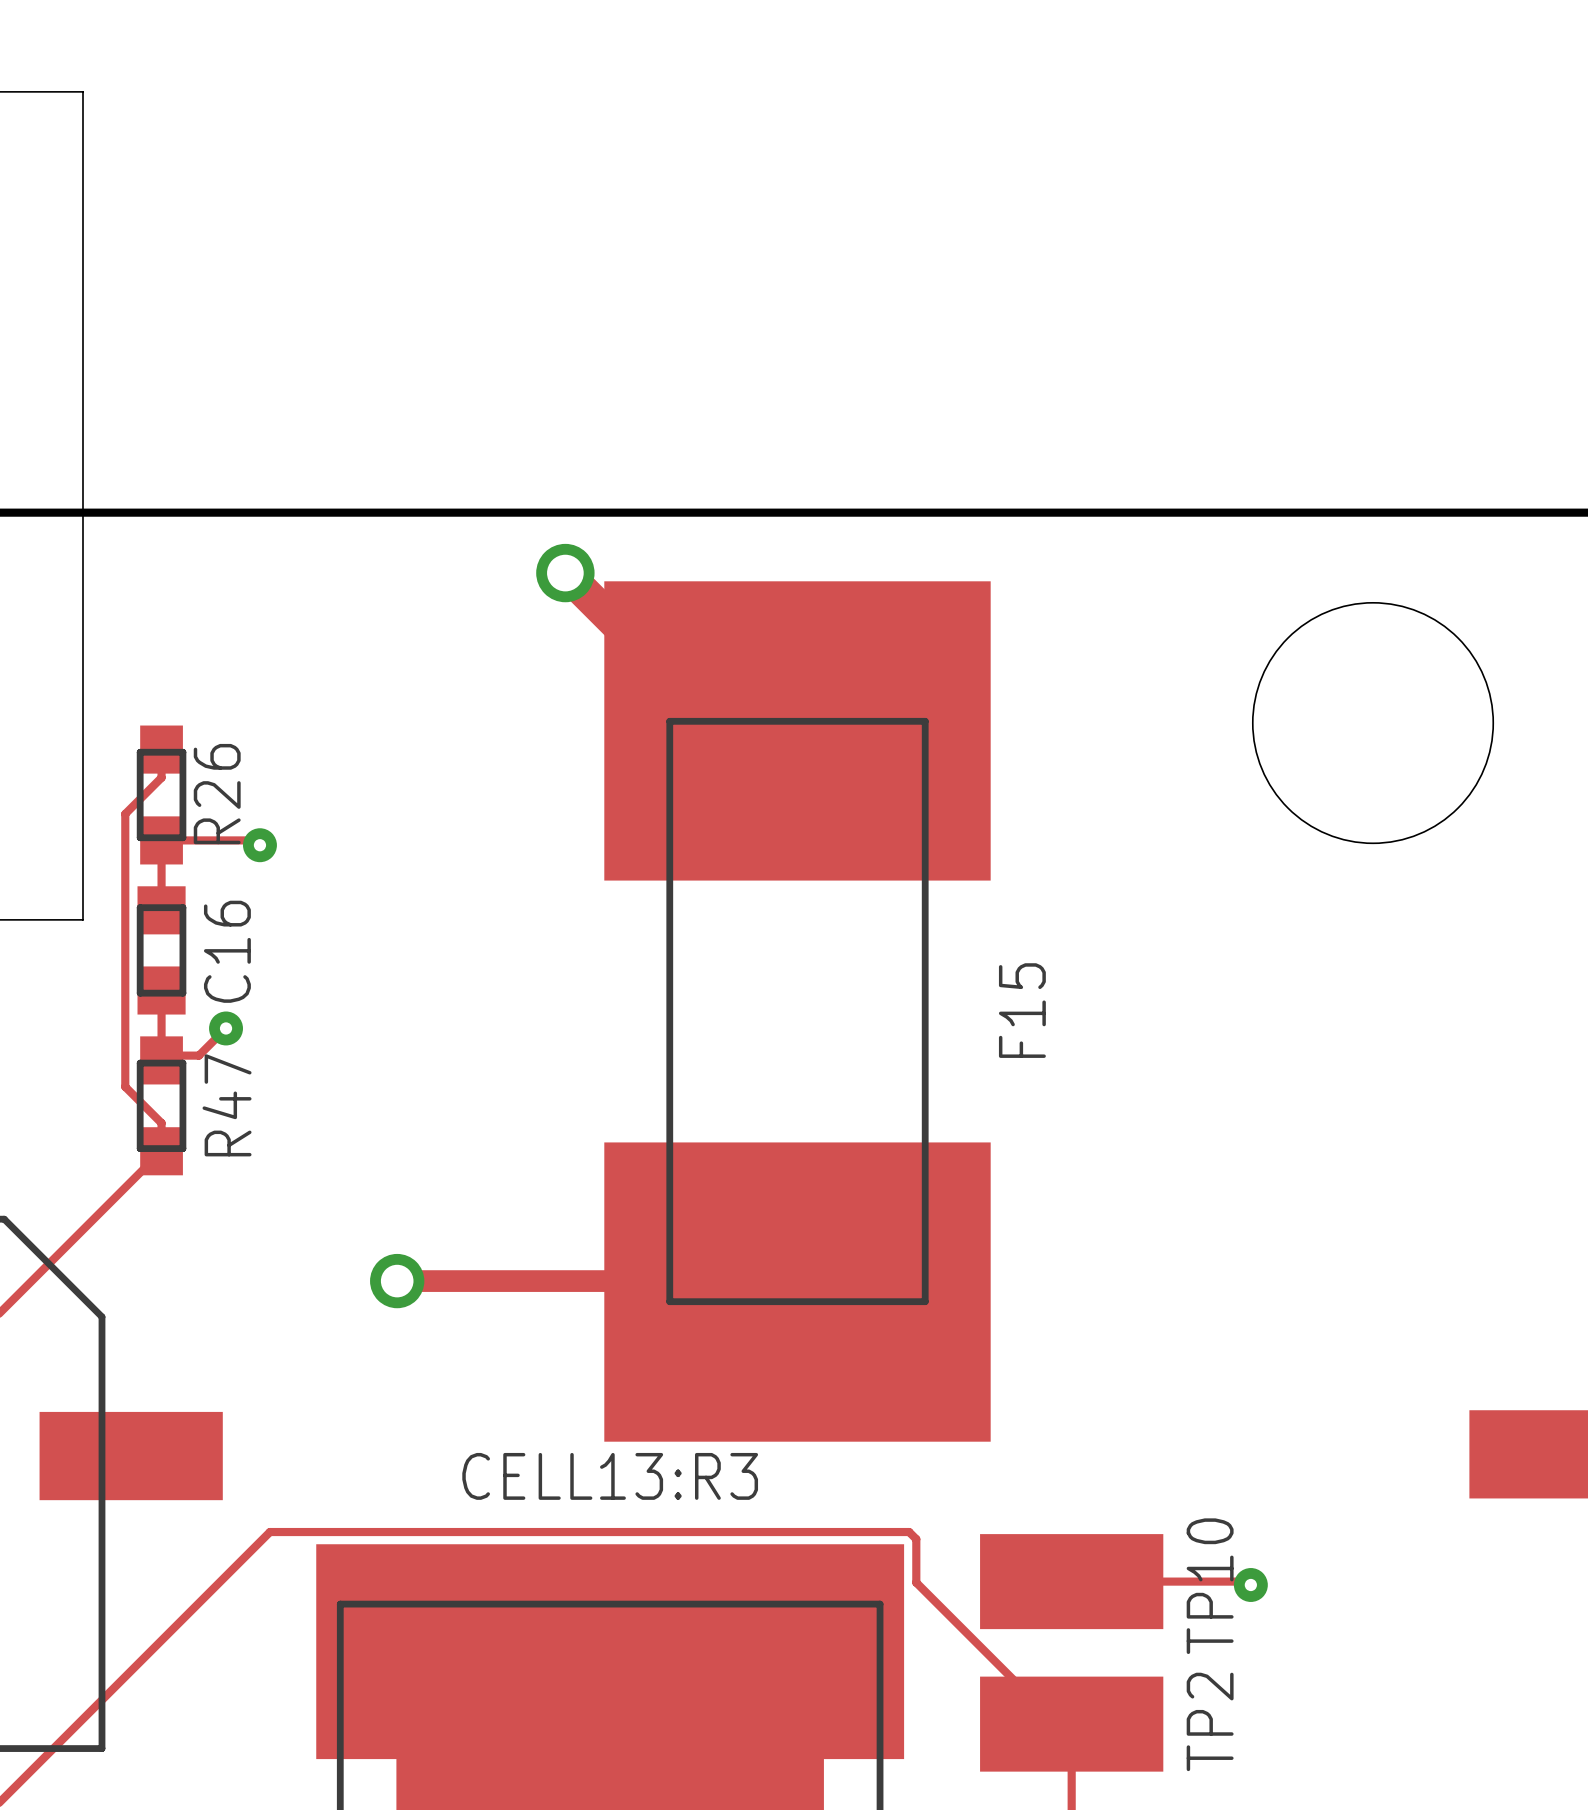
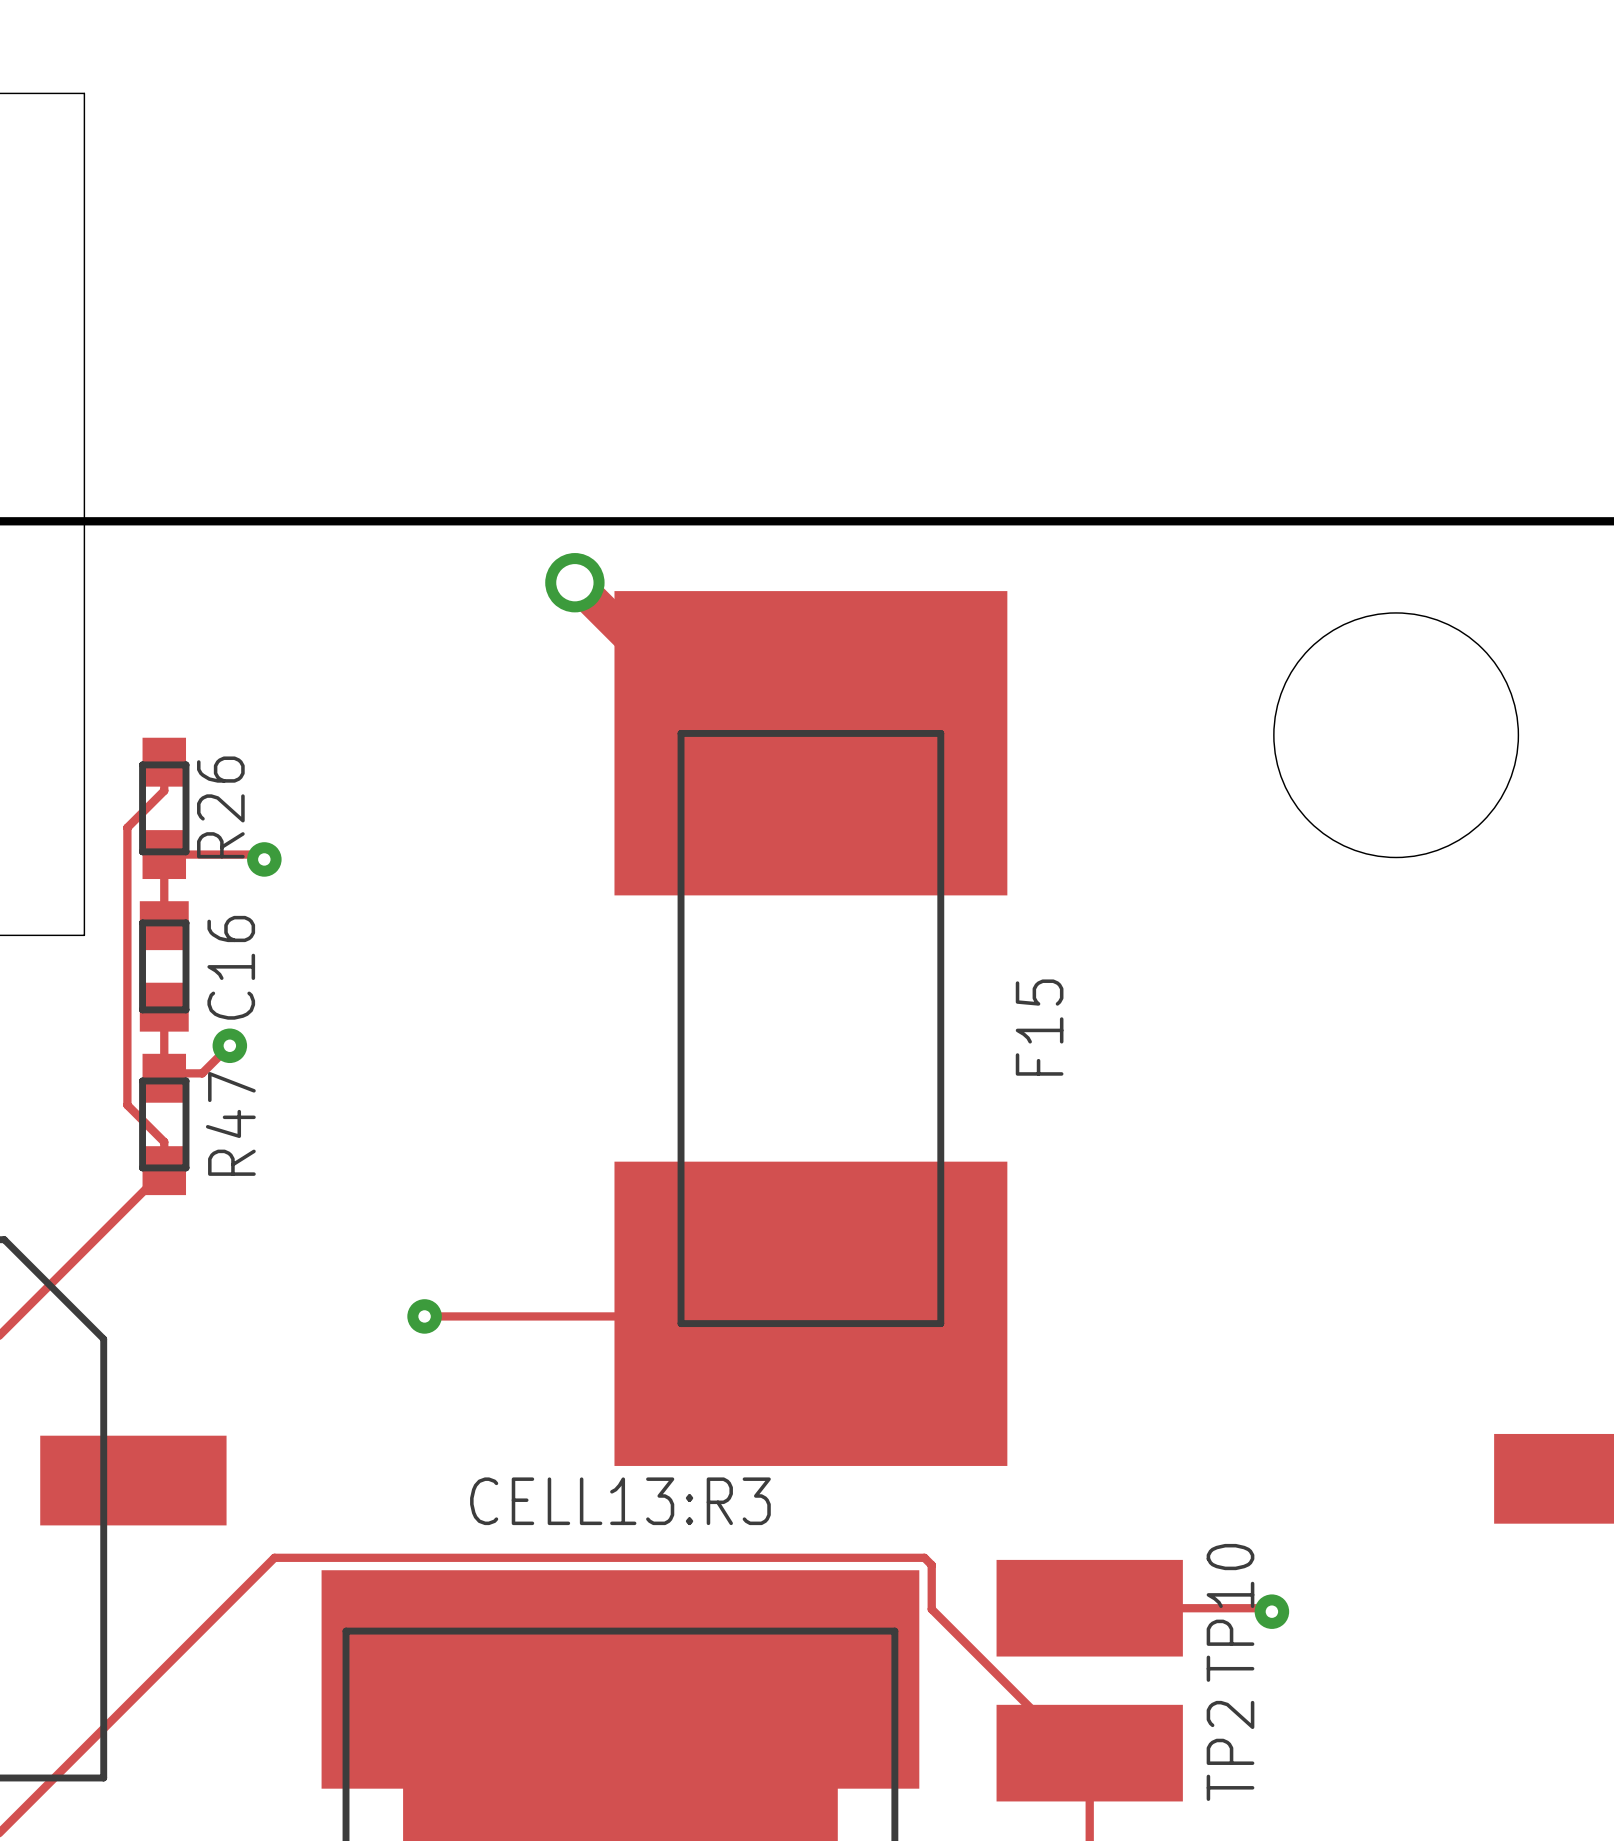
via size: [370, 1253, 425, 1309] -> [407, 1299, 442, 1334]
track: (397, 1281) (786, 1281) (797, 1292) -> (424, 1316) (808, 1316) (810, 1313)

